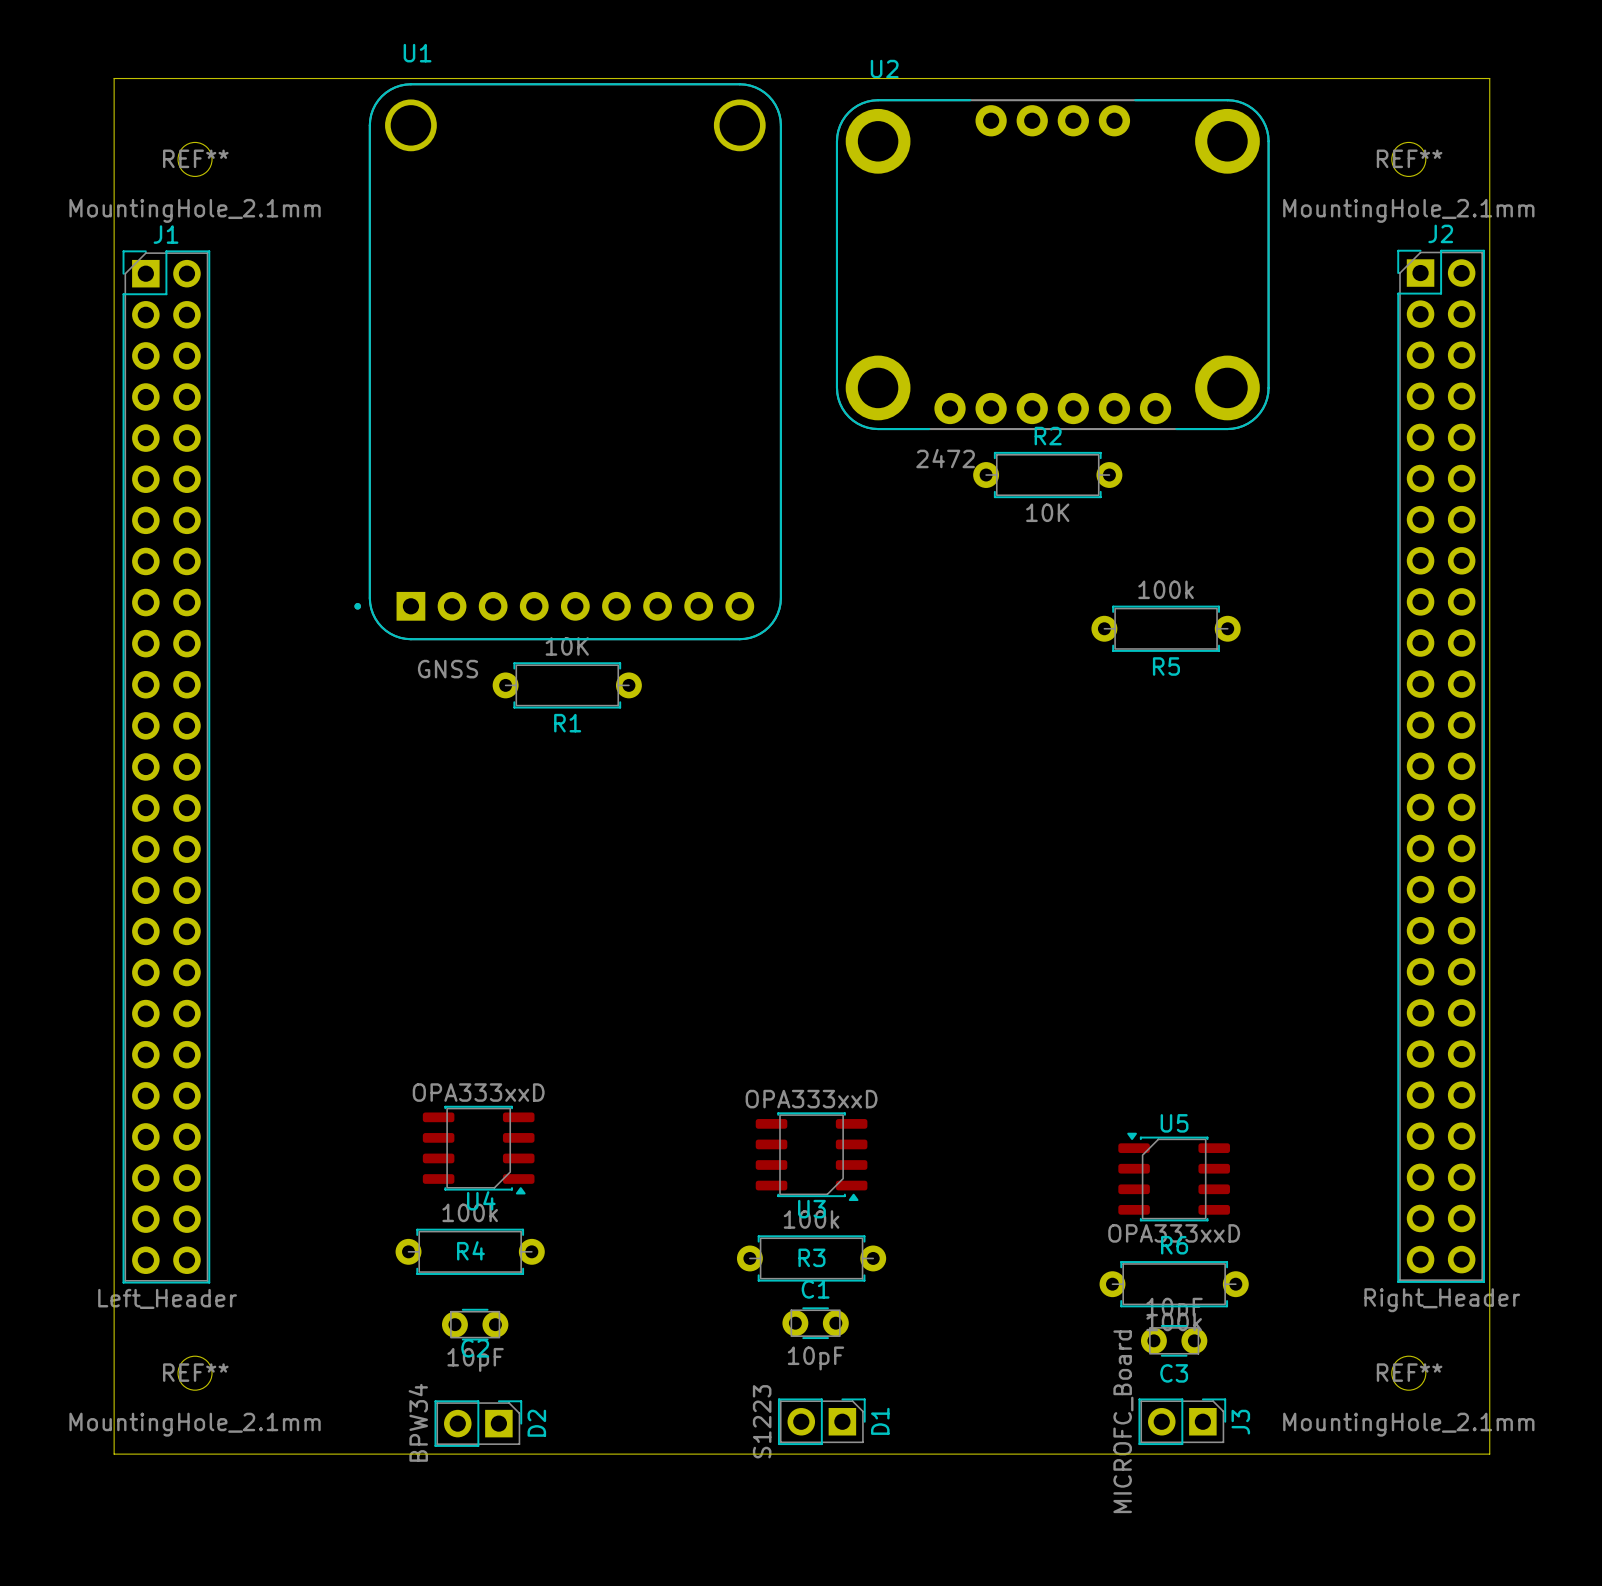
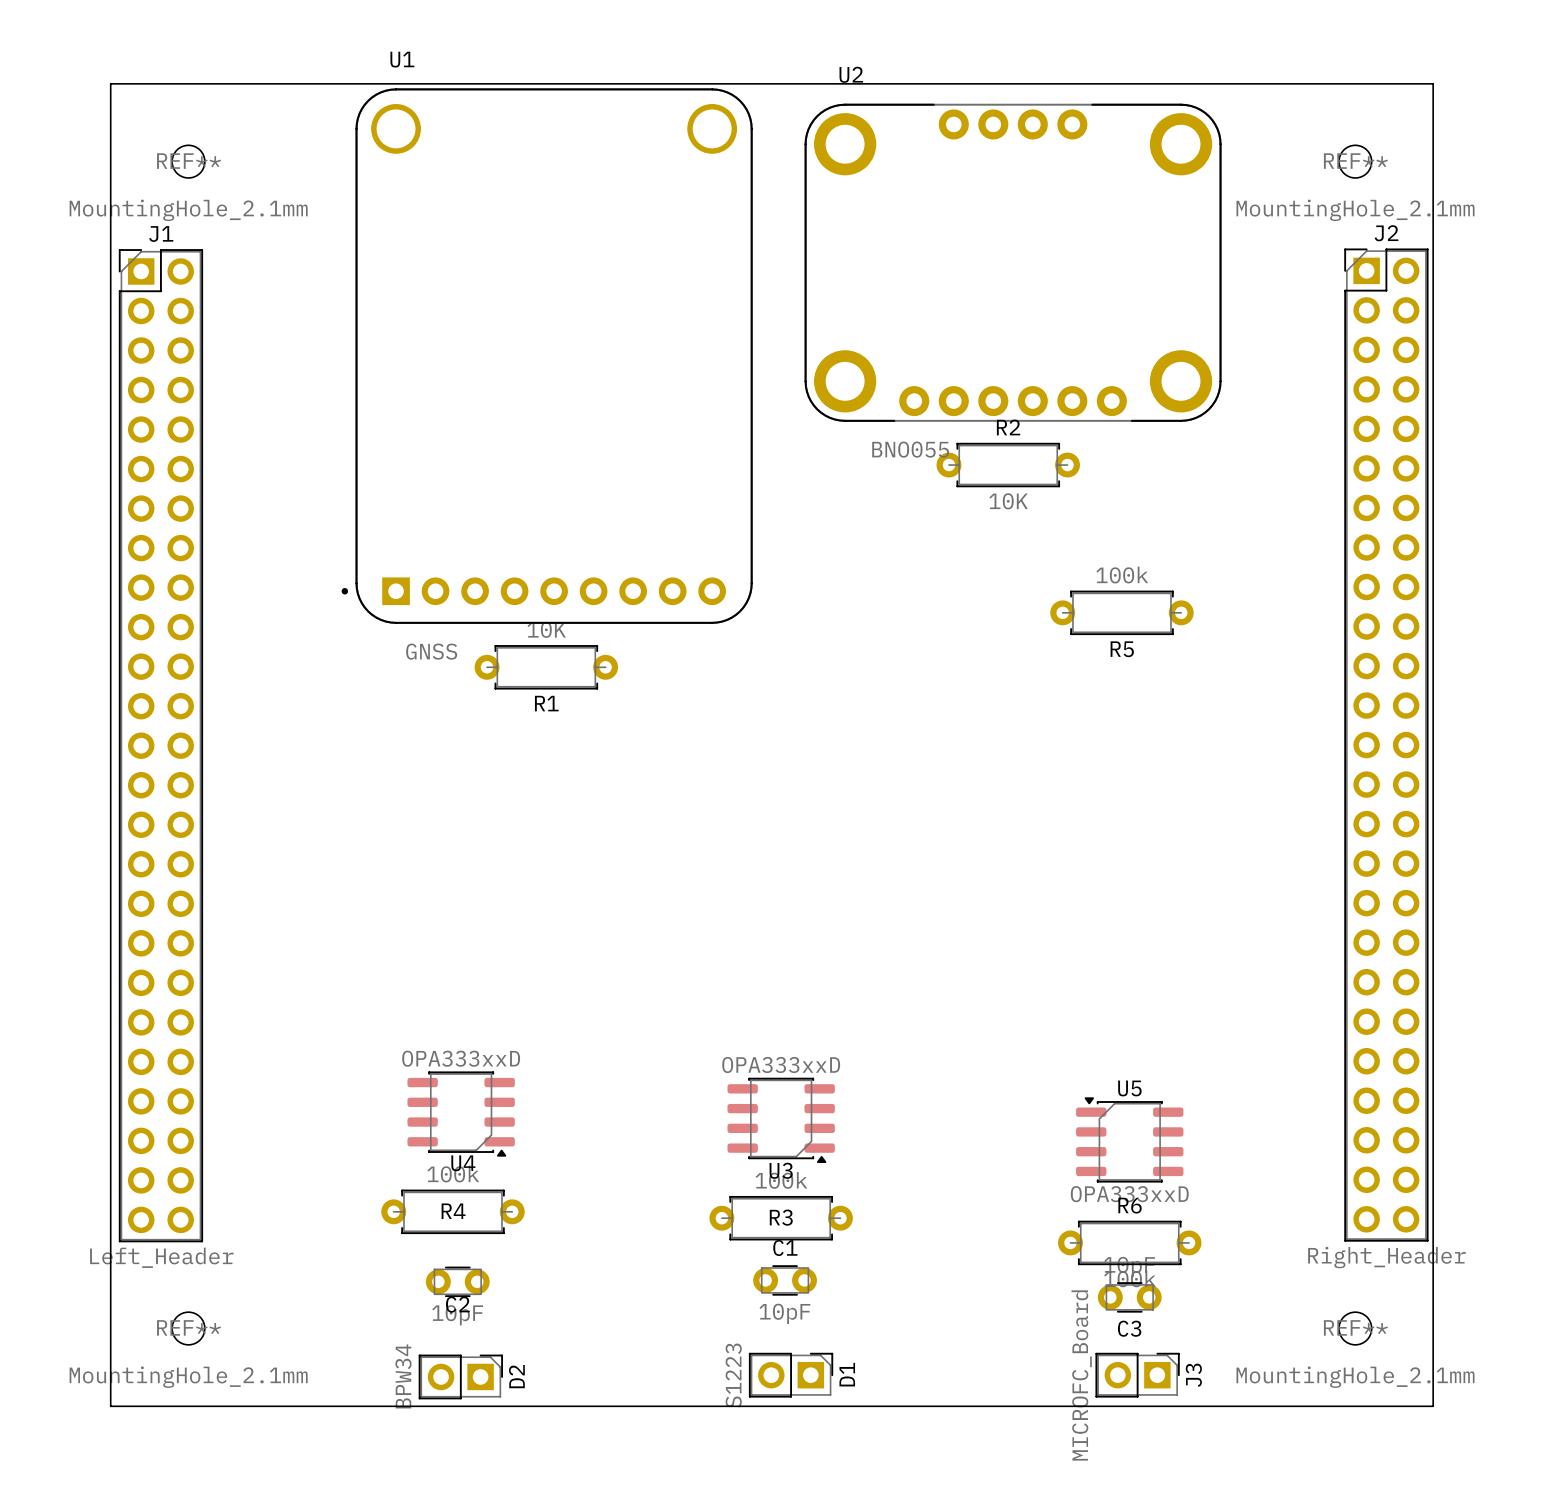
U2 value: 2472 (945, 458) -> BNO055 (910, 449)

